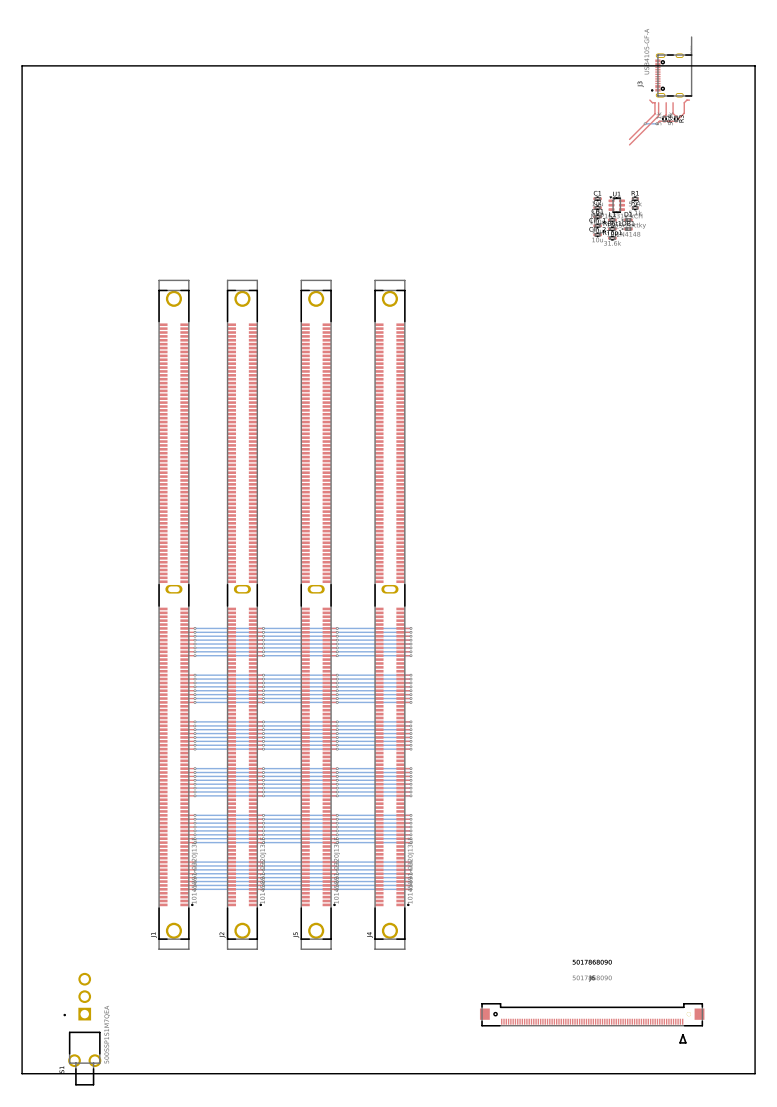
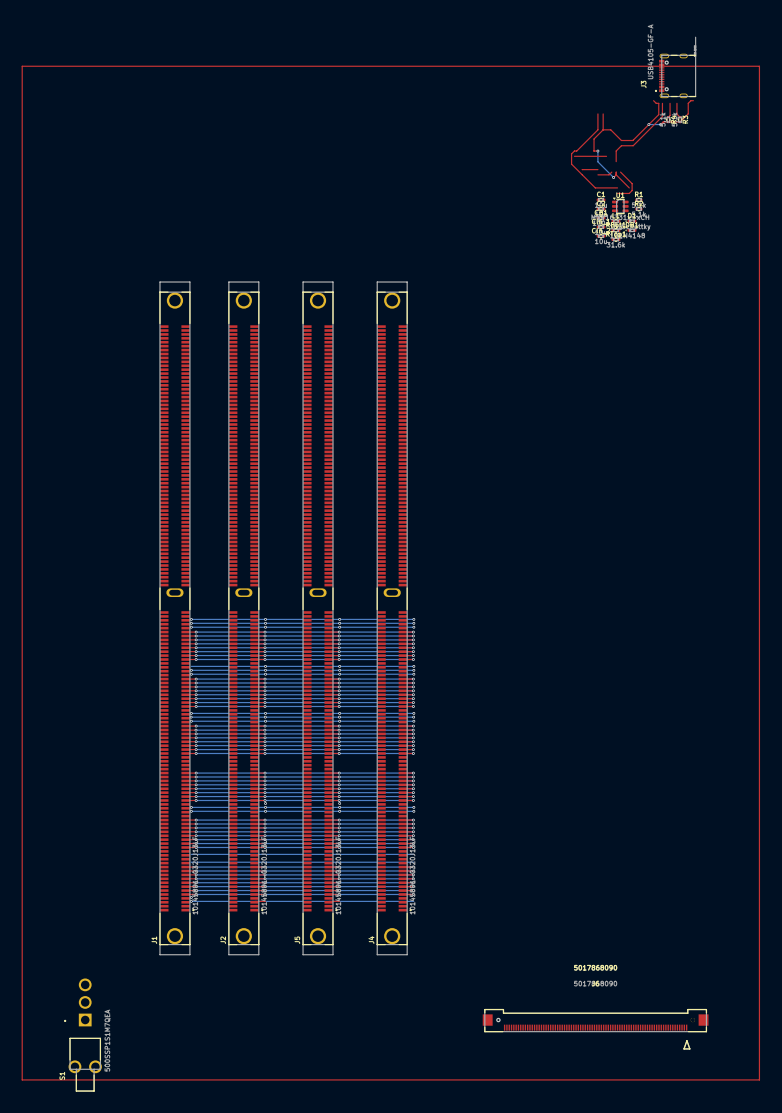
board edge: (22, 65) (755, 65) (755, 1073) (22, 1073) (22, 65) -> none
top track: none -> (22, 66) (759, 66) (759, 1079) (22, 1079) (22, 66)
top track: none -> (597, 113) (597, 129) (571, 153) (571, 164) (595, 187) (617, 187)
top track: none -> (603, 113) (603, 129)
top track: none -> (603, 129) (610, 129) (621, 140) (633, 140)
top track: none -> (603, 129) (594, 138) (594, 151)
top track: none -> (633, 145) (621, 145) (616, 150) (616, 161)
top track: none -> (594, 151) (597, 151)
bottom track: none -> (597, 151) (597, 161) (613, 177)
via: none -> (597, 151)
top track: none -> (574, 156) (606, 156)
top track: none -> (582, 169) (597, 169)
top track: none -> (611, 172) (609, 174) (597, 174)
top track: none -> (616, 172) (613, 177)
top track: none -> (620, 172) (632, 183) (632, 190) (629, 193) (617, 193)
top track: none -> (616, 174) (629, 187)
via: none -> (613, 177)
bottom track: none -> (191, 619) (413, 619)
via: none -> (191, 619)
via: none -> (265, 619)
via: none -> (339, 619)
via: none -> (413, 619)
bottom track: none -> (191, 623) (413, 623)
via: none -> (191, 623)
via: none -> (265, 623)
via: none -> (339, 623)
via: none -> (413, 623)
bottom track: none -> (191, 627) (413, 627)
via: none -> (191, 627)
via: none -> (265, 627)
via: none -> (339, 627)
via: none -> (413, 627)
bottom track: none -> (191, 666) (413, 666)
via: none -> (265, 666)
via: none -> (339, 666)
via: none -> (413, 666)
bottom track: none -> (191, 670) (413, 670)
via: none -> (191, 670)
via: none -> (265, 670)
via: none -> (339, 670)
via: none -> (413, 670)
bottom track: none -> (191, 674) (413, 674)
via: none -> (191, 674)
via: none -> (265, 674)
via: none -> (339, 674)
via: none -> (413, 674)
bottom track: none -> (191, 713) (413, 713)
via: none -> (191, 713)
via: none -> (265, 713)
via: none -> (339, 713)
via: none -> (413, 713)
bottom track: none -> (191, 717) (413, 717)
via: none -> (191, 717)
via: none -> (265, 717)
via: none -> (339, 717)
via: none -> (413, 717)
bottom track: none -> (191, 721) (413, 721)
via: none -> (191, 721)
via: none -> (265, 721)
via: none -> (339, 721)
via: none -> (413, 721)
via: none -> (265, 803)
via: none -> (339, 803)
bottom track: none -> (191, 807) (413, 807)
via: none -> (191, 807)
via: none -> (265, 807)
via: none -> (339, 807)
via: none -> (413, 807)
bottom track: none -> (191, 811) (413, 811)
via: none -> (191, 811)
via: none -> (265, 811)
via: none -> (339, 811)
via: none -> (413, 811)
bottom track: none -> (191, 854) (413, 854)
bottom track: none -> (191, 862) (413, 862)
via: none -> (191, 897)
bottom track: none -> (191, 901) (413, 901)
via: none -> (191, 901)
top track: none -> (254, 901) (265, 901)
top track: none -> (329, 901) (339, 901)

